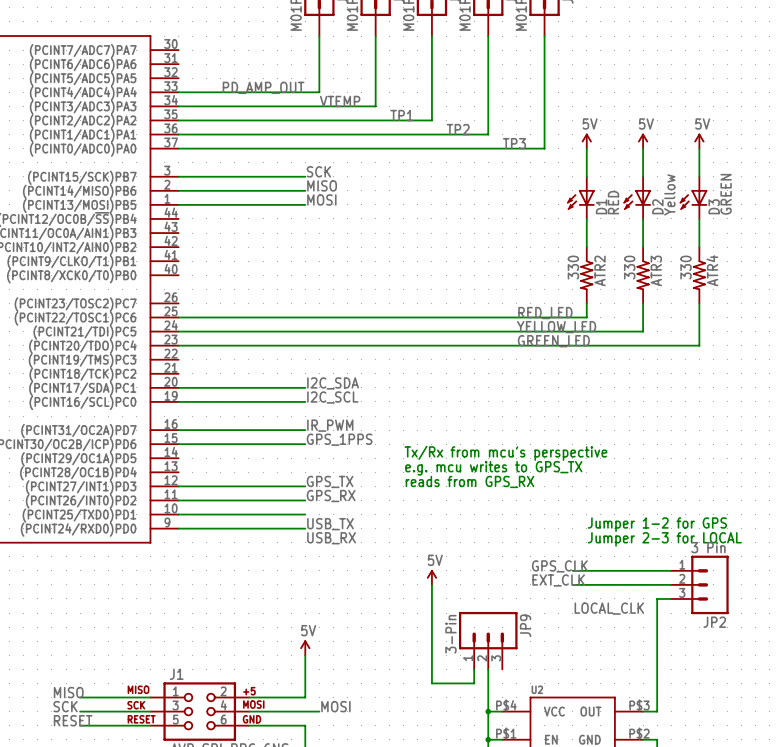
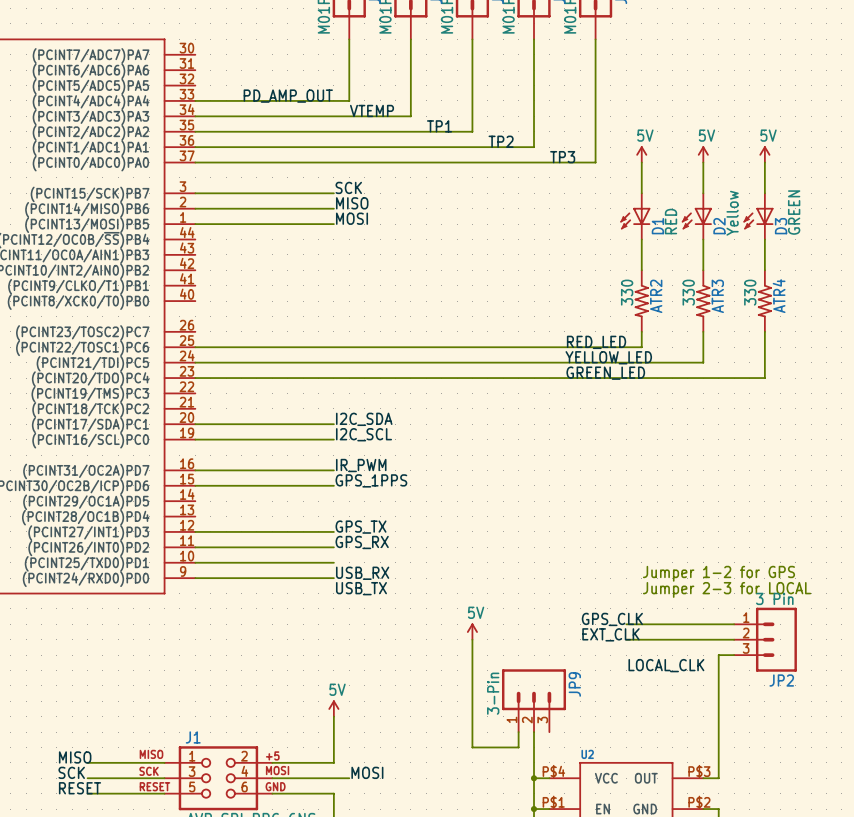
text: Tx/Rx from mcu's perspective (505, 453) -> none
text: e.g. mcu writes to GPS_TX (493, 468) -> none
text: reads from GPS_RX (469, 481) -> none
label: USB_TX (330, 524) -> USB_RX (362, 573)
label: USB_RX (331, 538) -> USB_TX (361, 588)

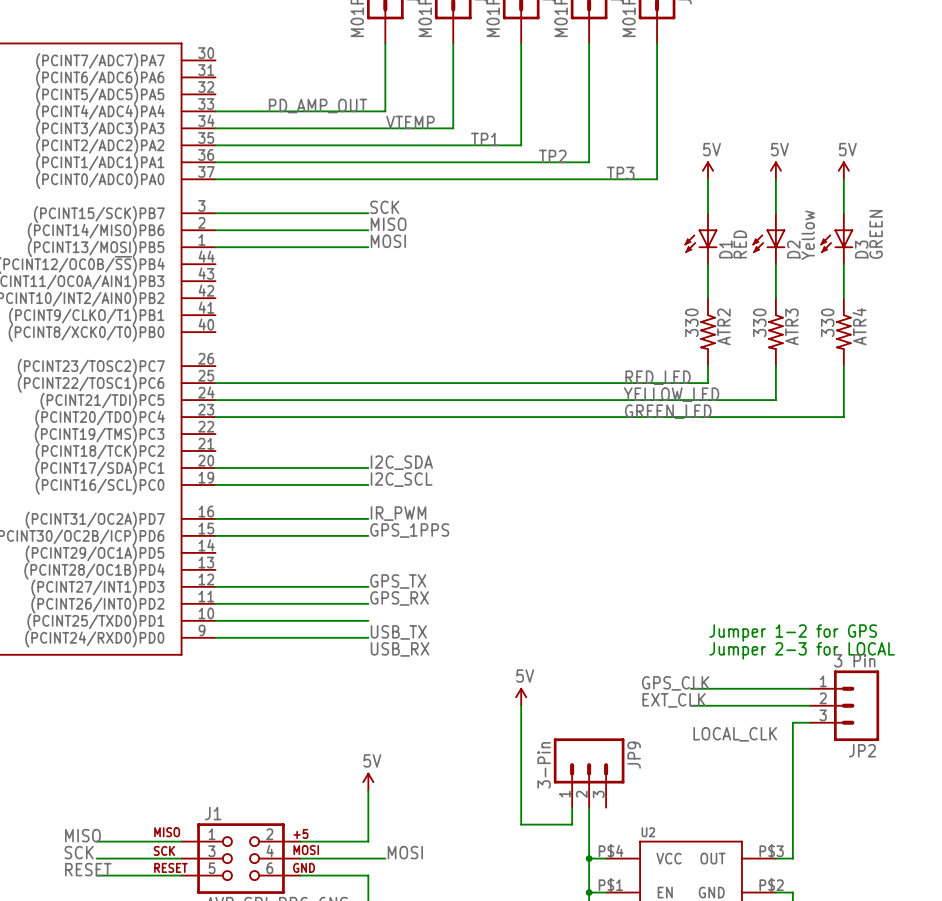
label: USB_RX (362, 573) -> USB_TX (398, 632)
label: USB_TX (361, 588) -> USB_RX (400, 649)

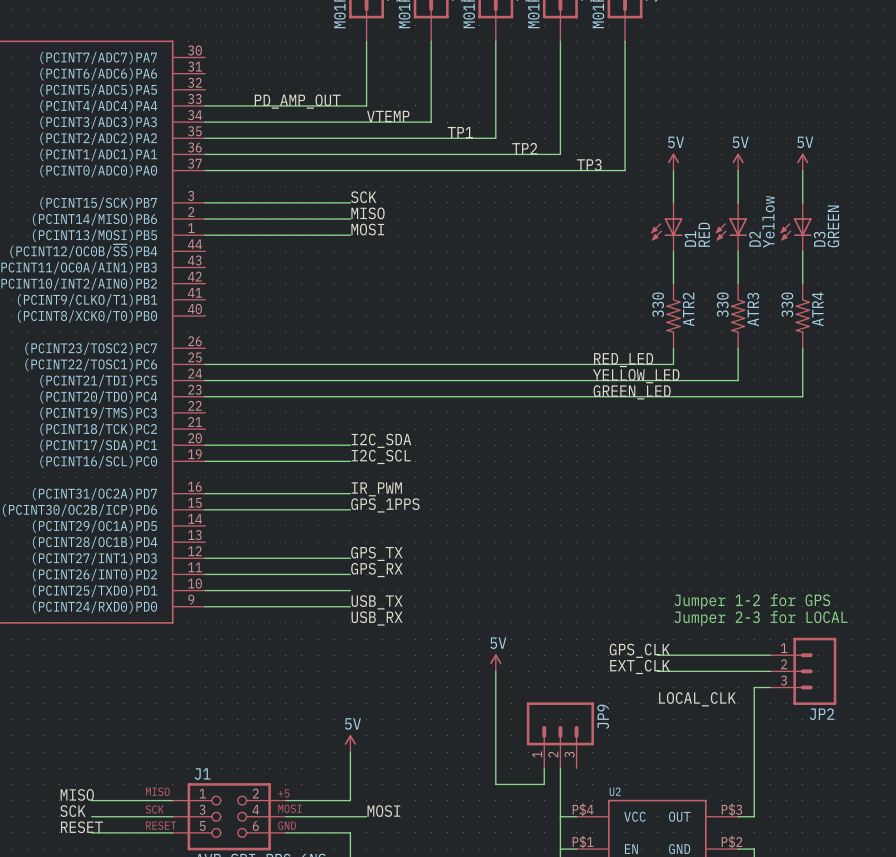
JP2 value: 3 Pin (854, 660) -> none
JP9 value: 3-Pin (544, 765) -> none
junction: (589, 858) -> none
junction: (589, 892) -> none

